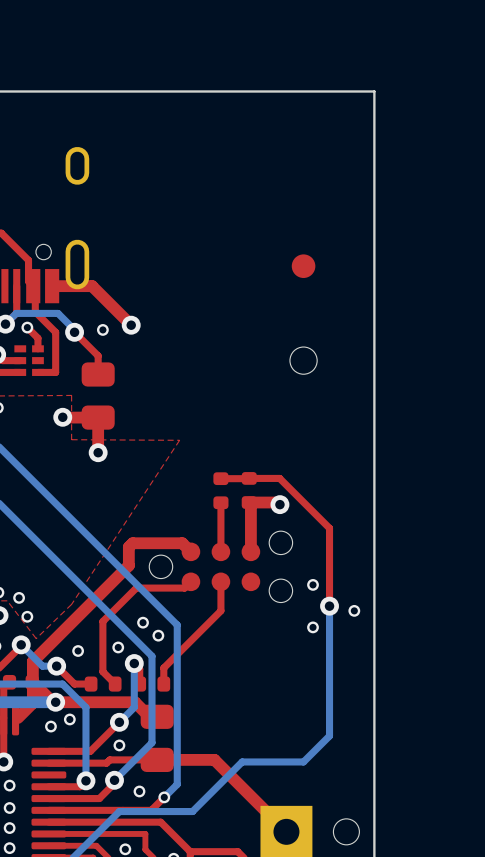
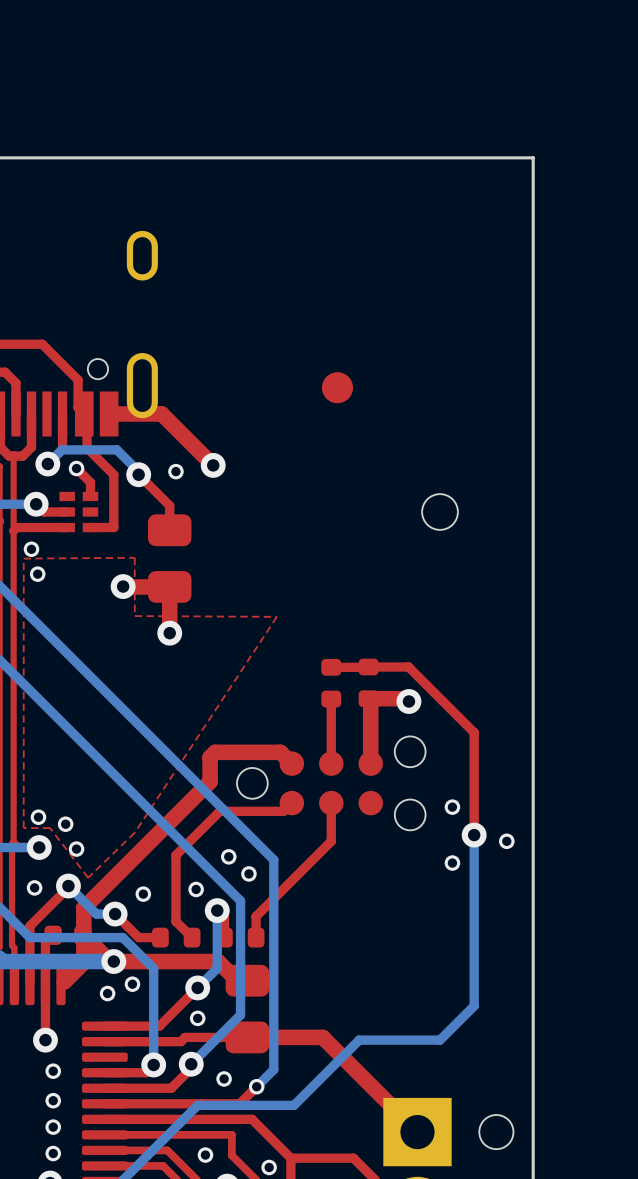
part position: (303, 266) -> (337, 387)

